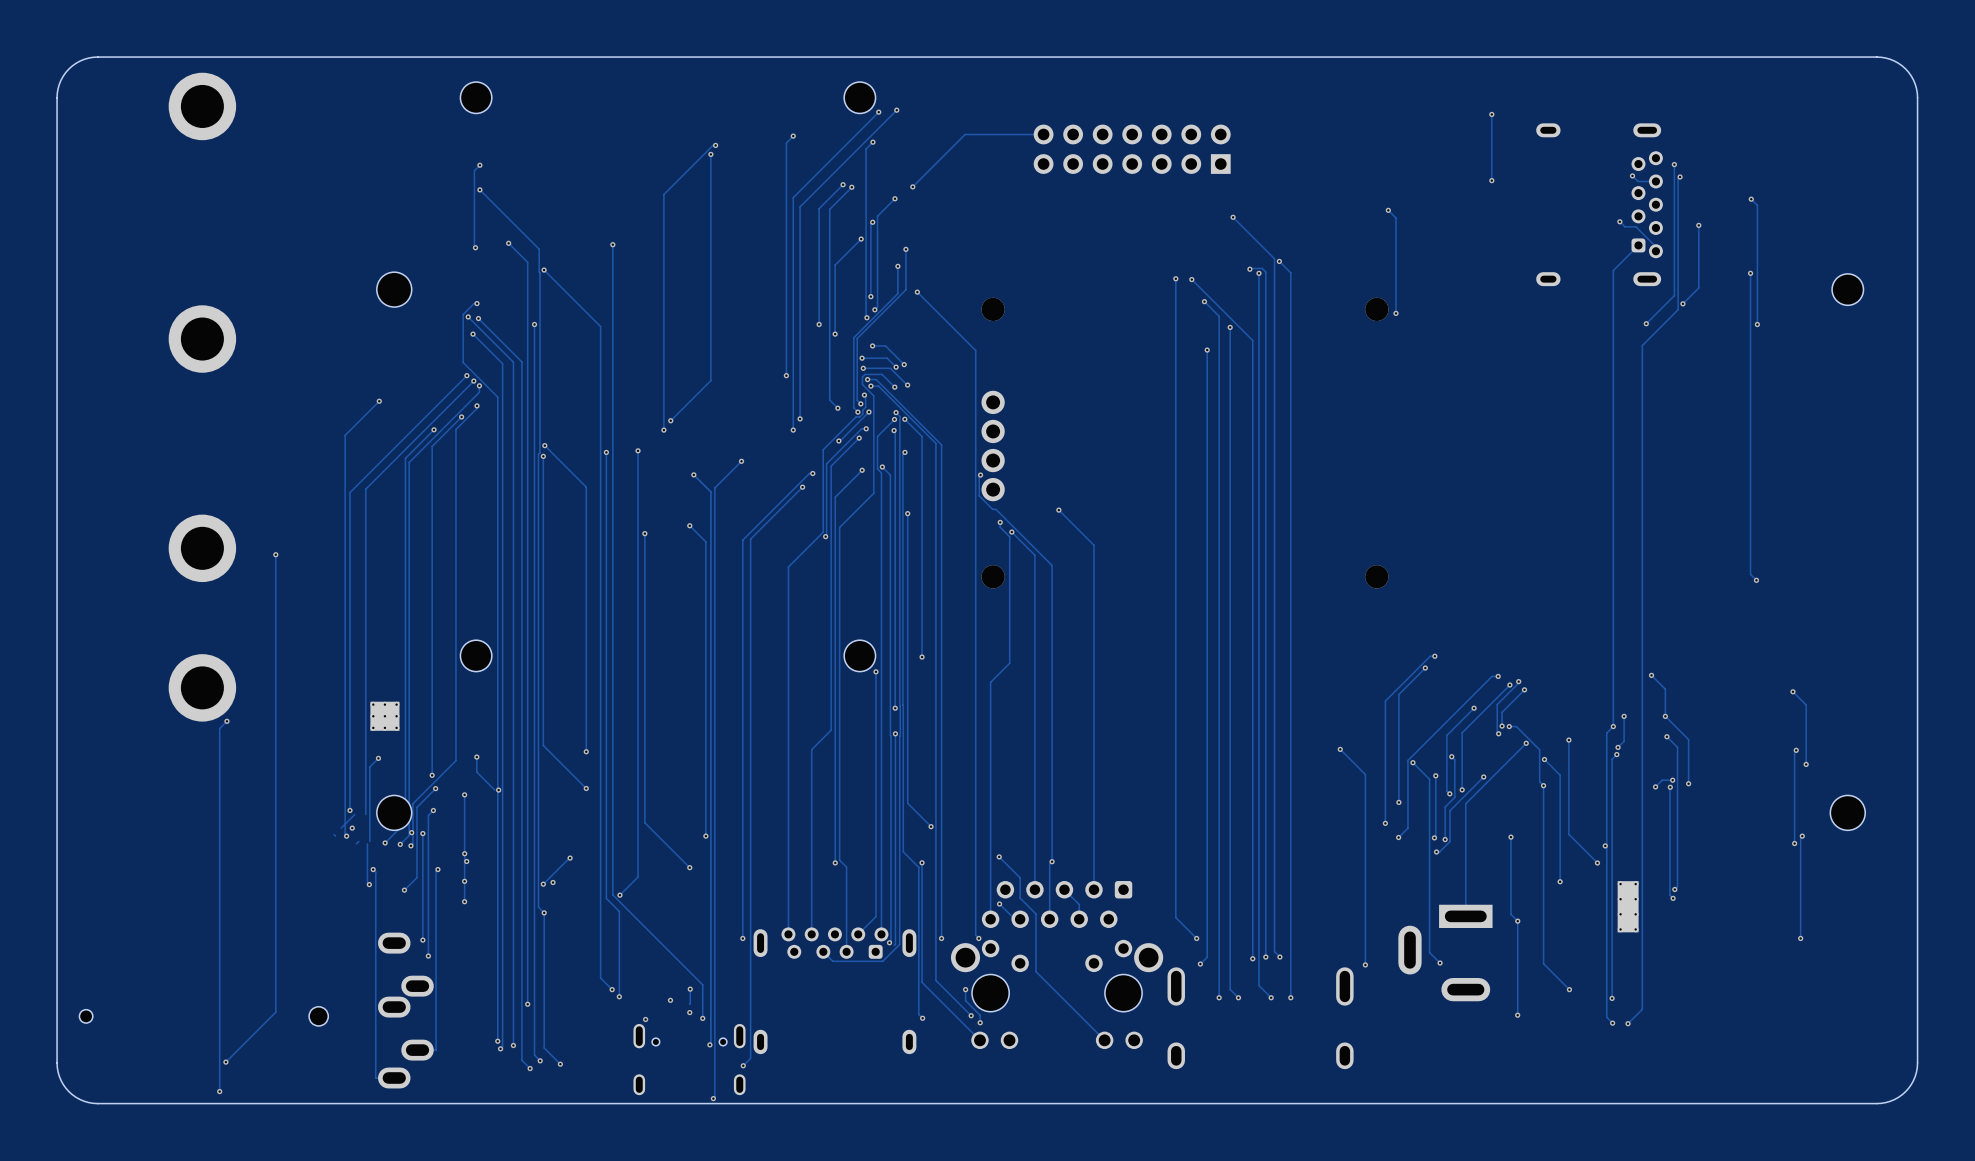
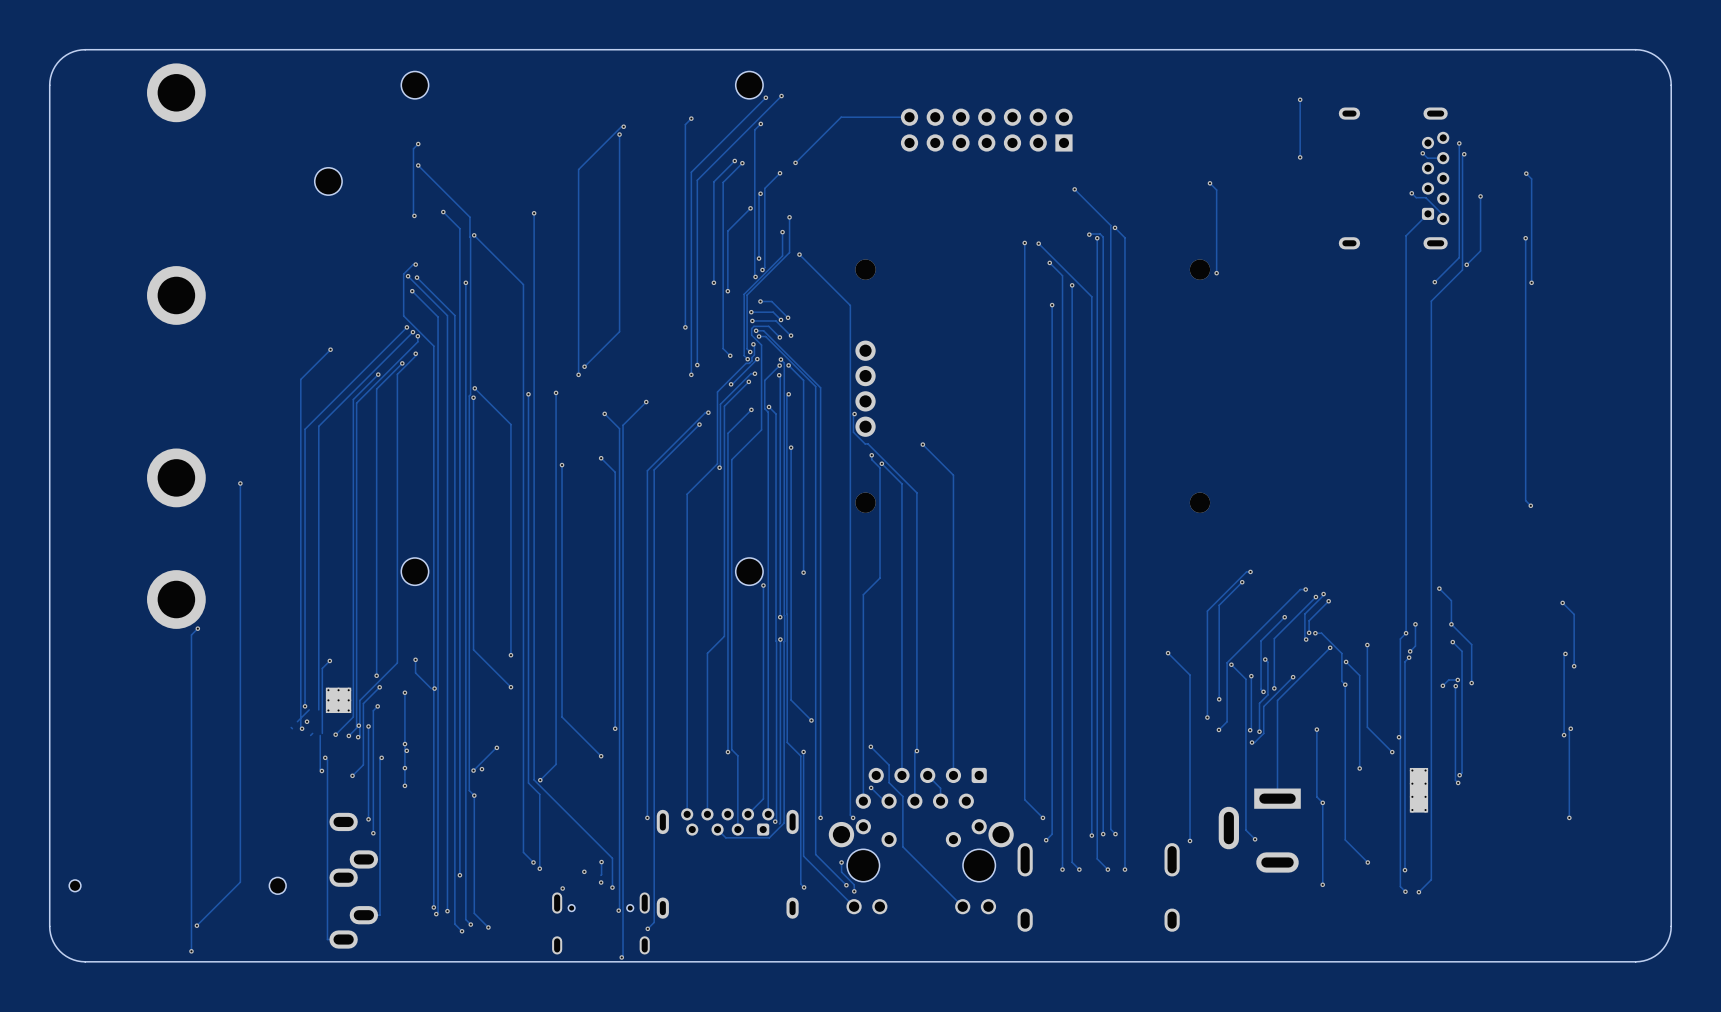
part: none -> (328, 181)
part: (394, 289) -> none
part: (1847, 289) -> none
part: (384, 716) -> none
part footprint: [376, 795, 412, 831] -> [325, 687, 352, 714]
part: (1847, 812) -> none

